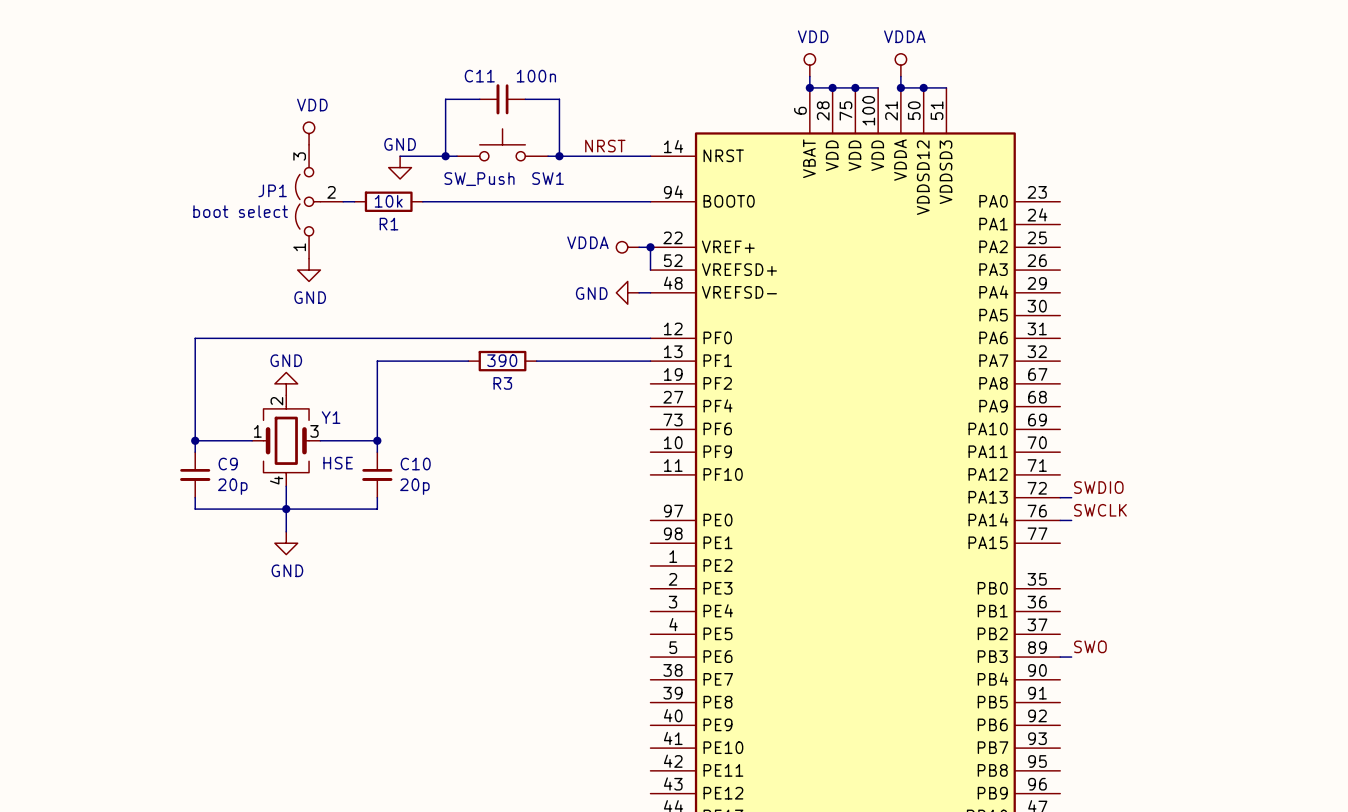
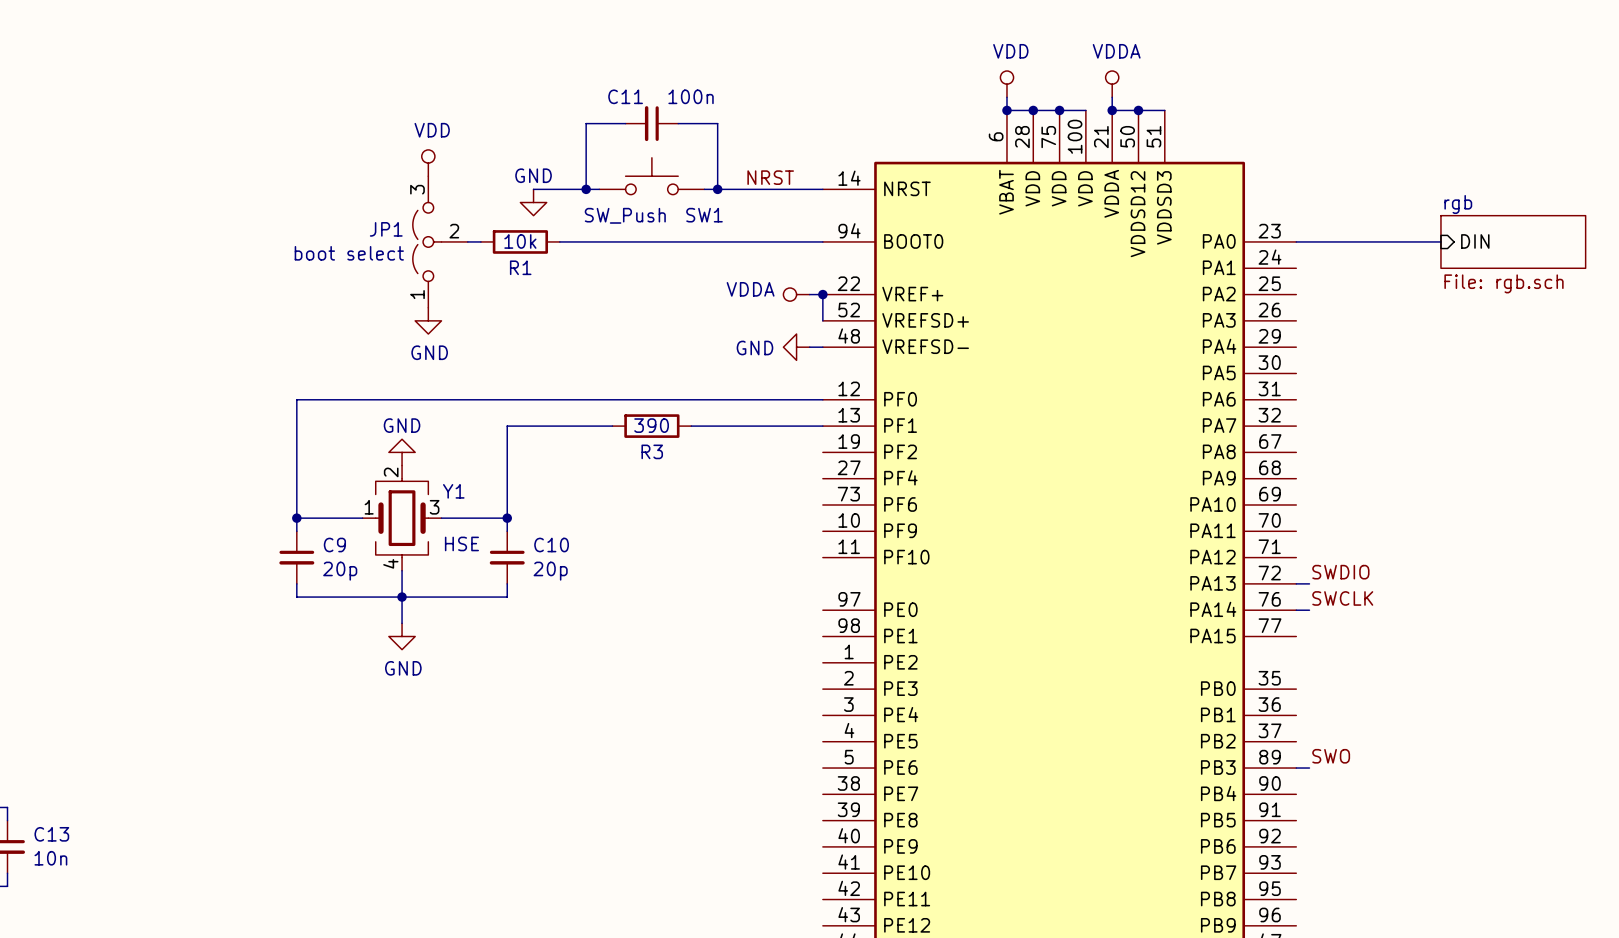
wire: none -> (1296, 241) (1440, 241)
sheet pin: none -> DIN (1475, 241)
sheet rgb: none -> File: rgb.sch (1513, 241)

